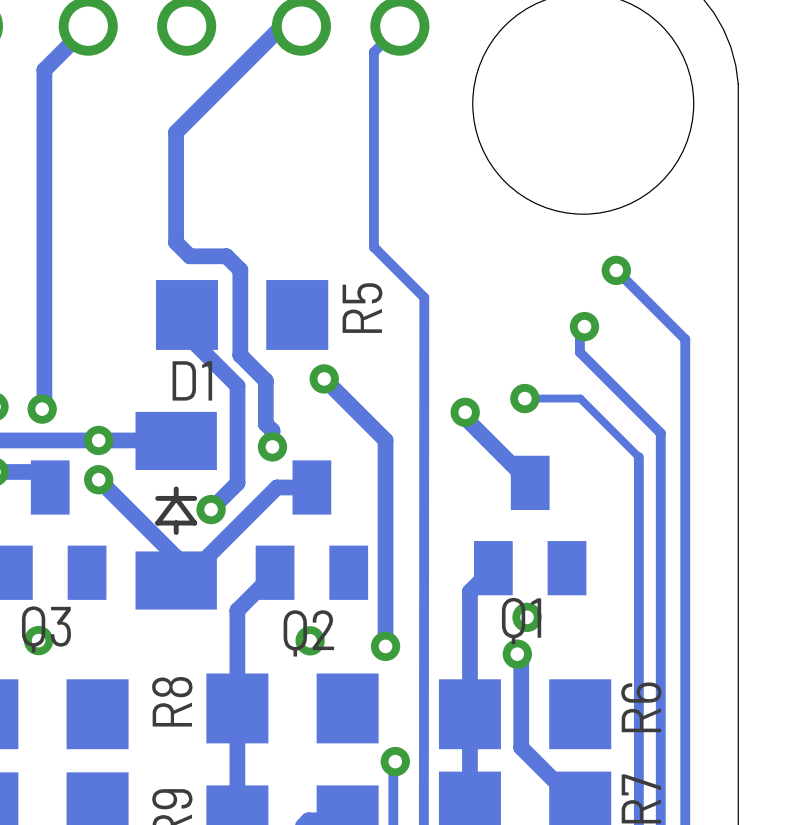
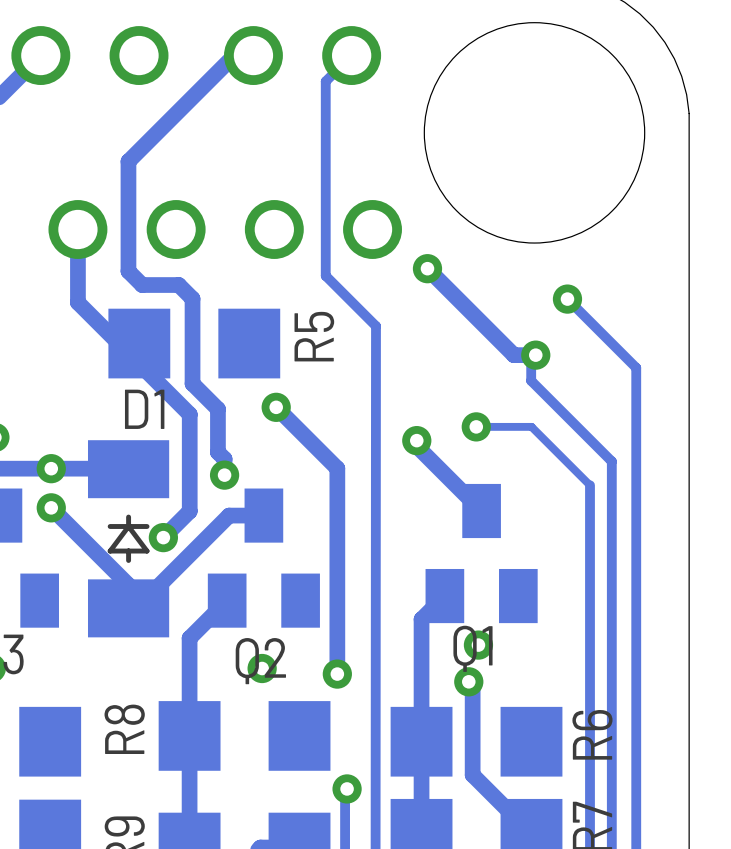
track: none -> (77, 229) (77, 302) (118, 343)
part: none -> (225, 229)
track: none -> (427, 268) (513, 355) (531, 355)
via: none -> (427, 268)

